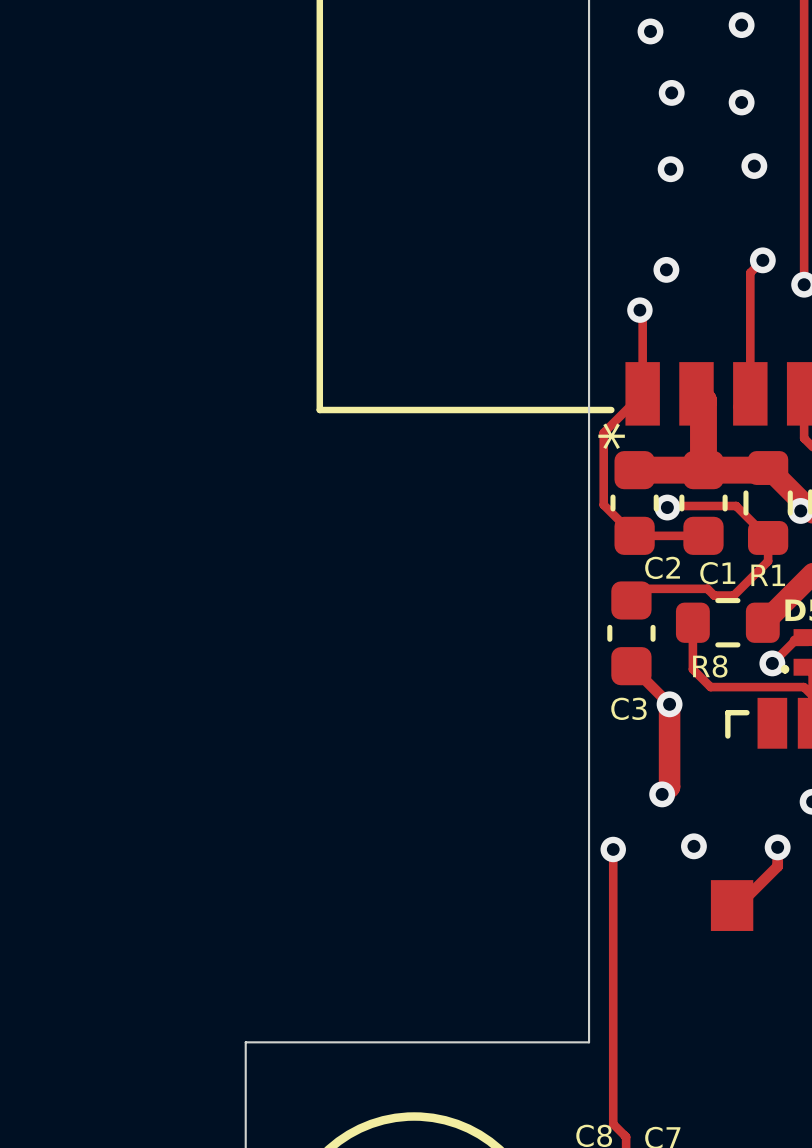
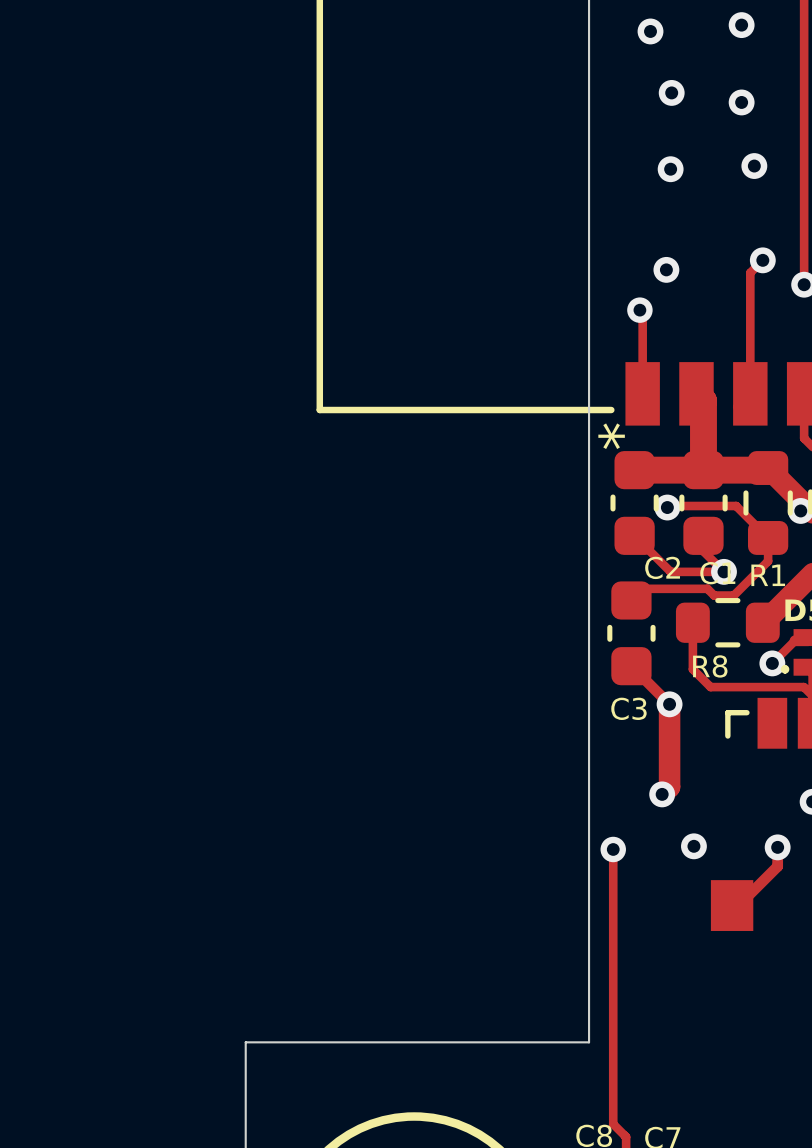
track: (642, 393) (603, 432) (603, 504) (634, 535) (703, 535) -> none
track: none -> (634, 535) (670, 571) (723, 571) (703, 551) (703, 543)
via: none -> (723, 571)

